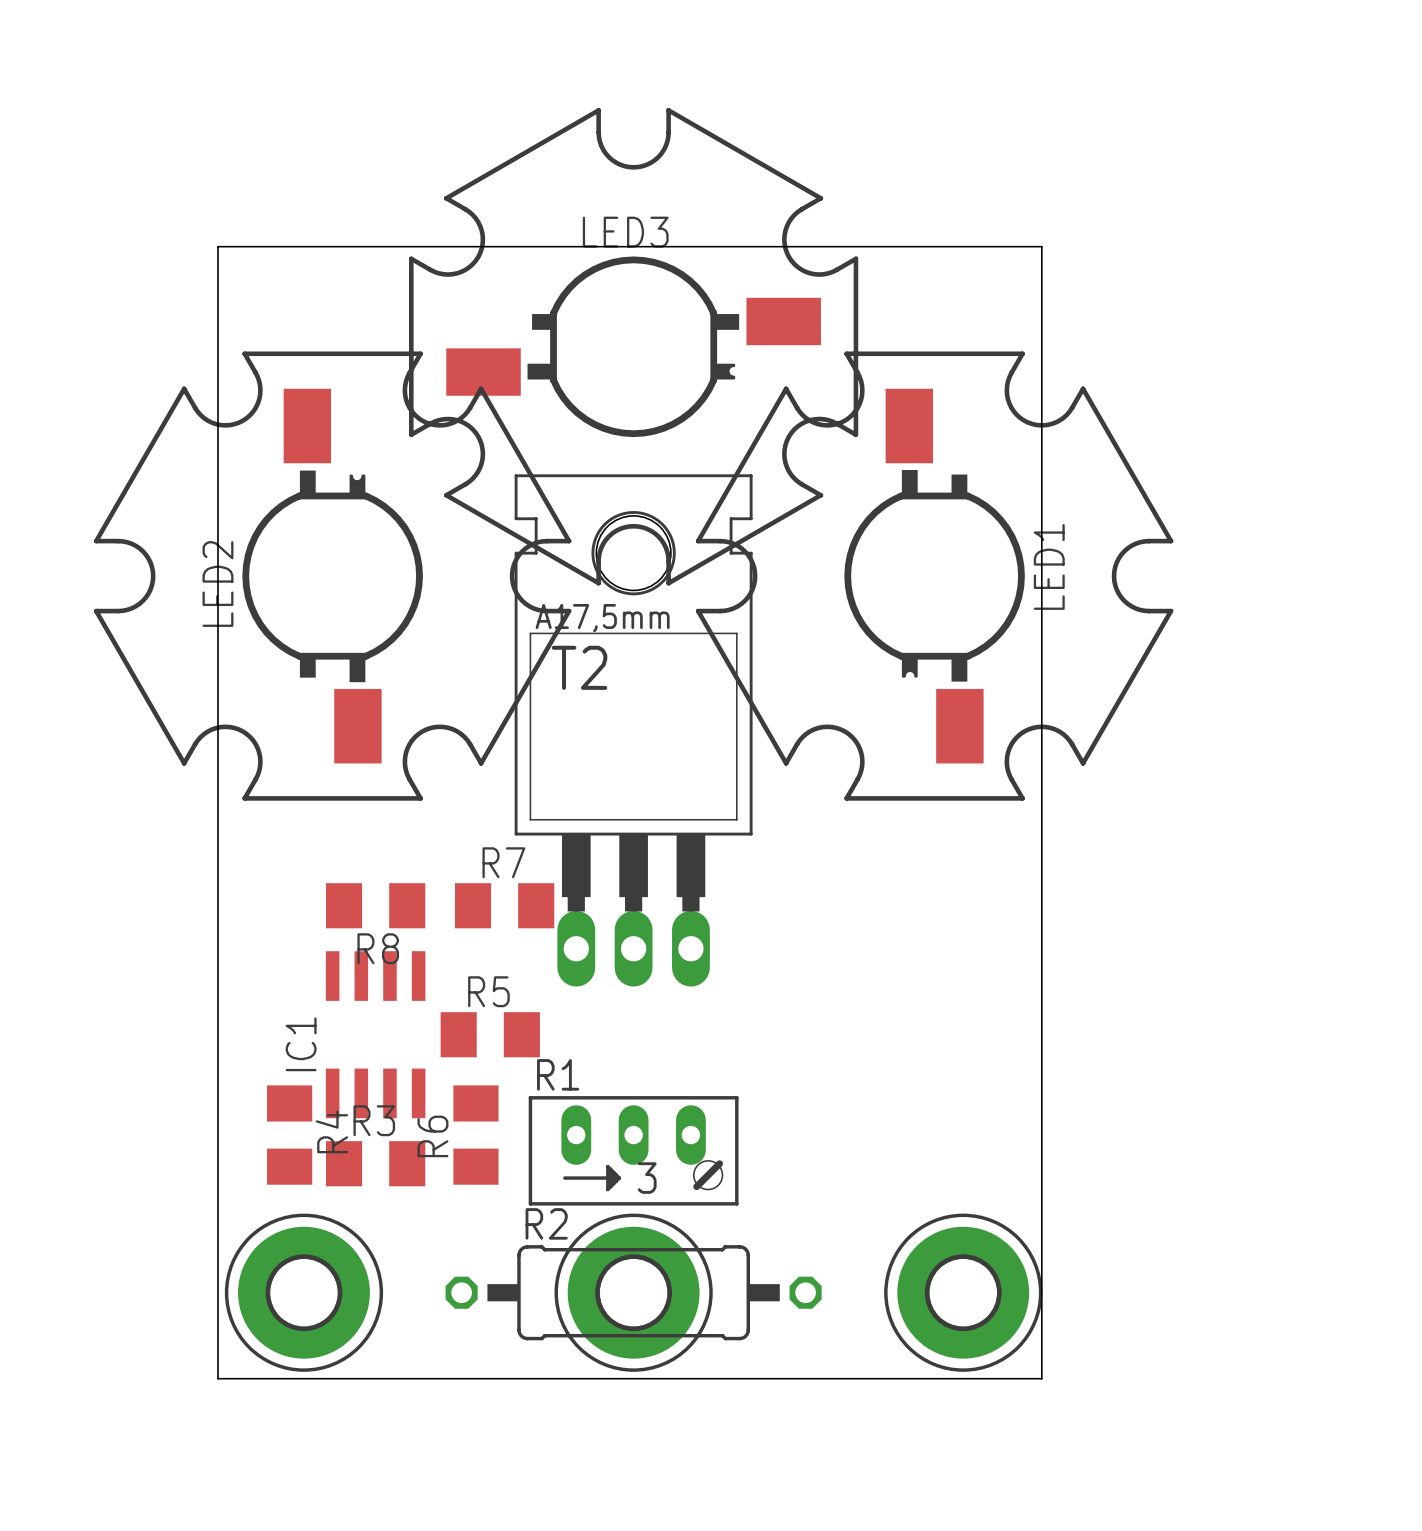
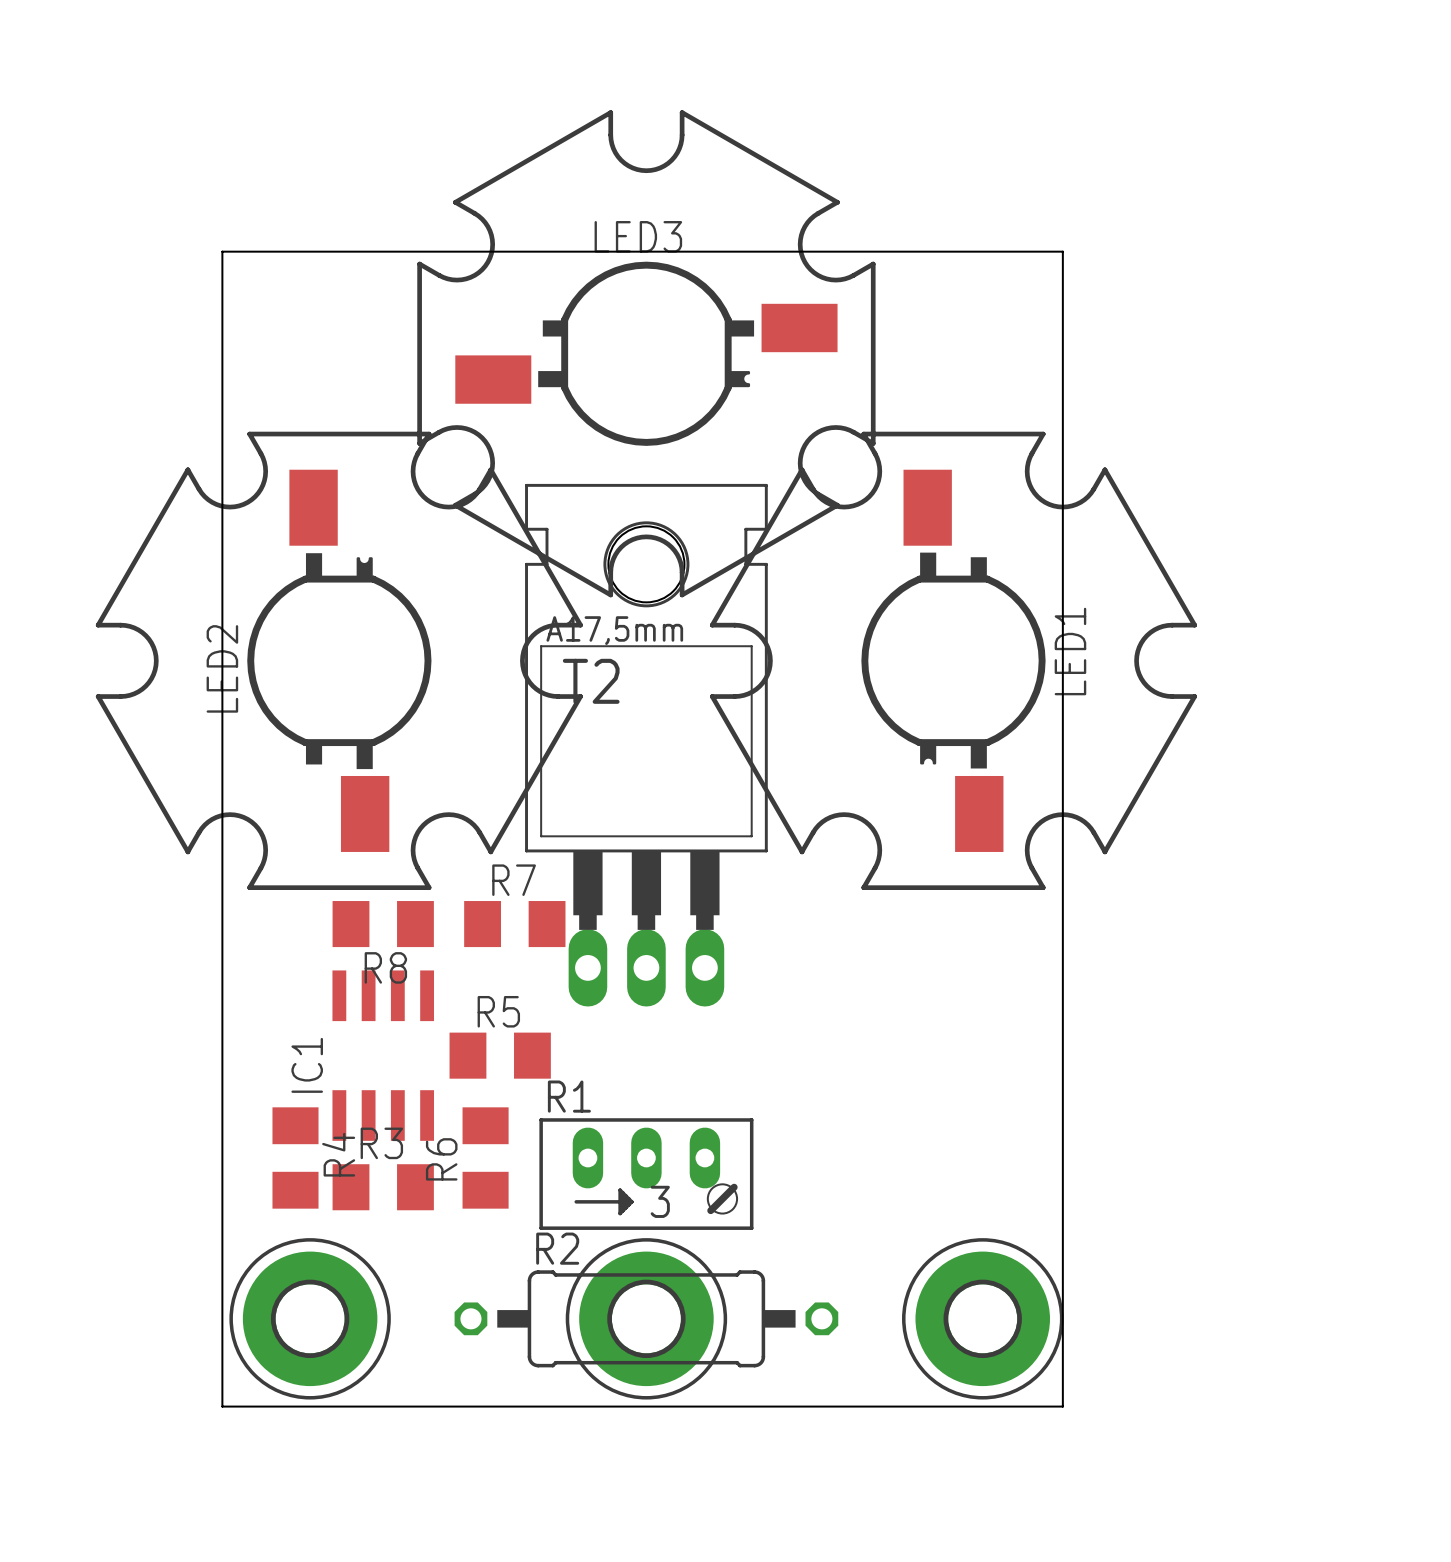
LED2 position: (332, 576) -> (339, 660)
LED1 position: (934, 576) -> (953, 660)

